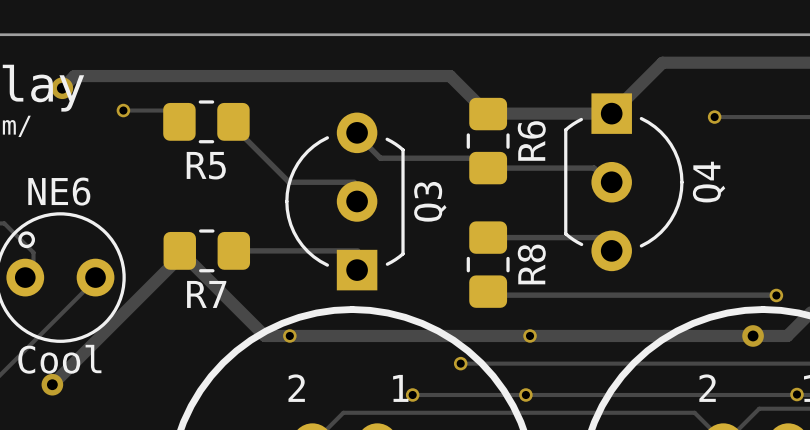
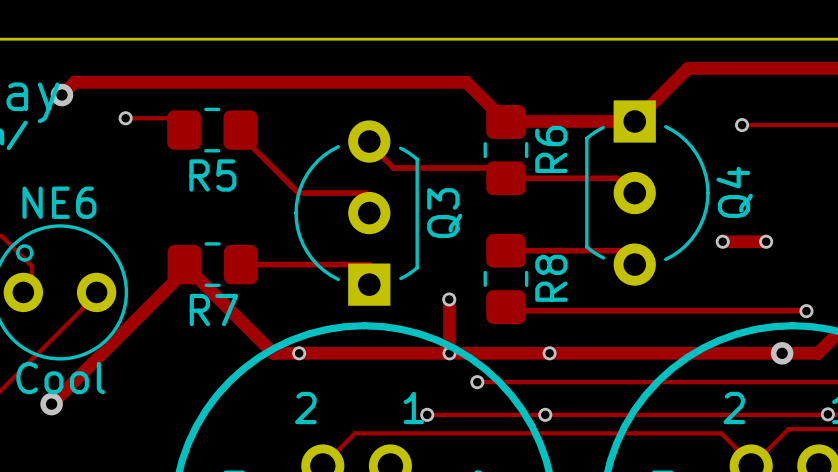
track: none -> (722, 241) (766, 241)
via: none -> (722, 241)
via: none -> (766, 241)
via: none -> (449, 299)
track: none -> (449, 299) (449, 353)
via: none -> (449, 353)

